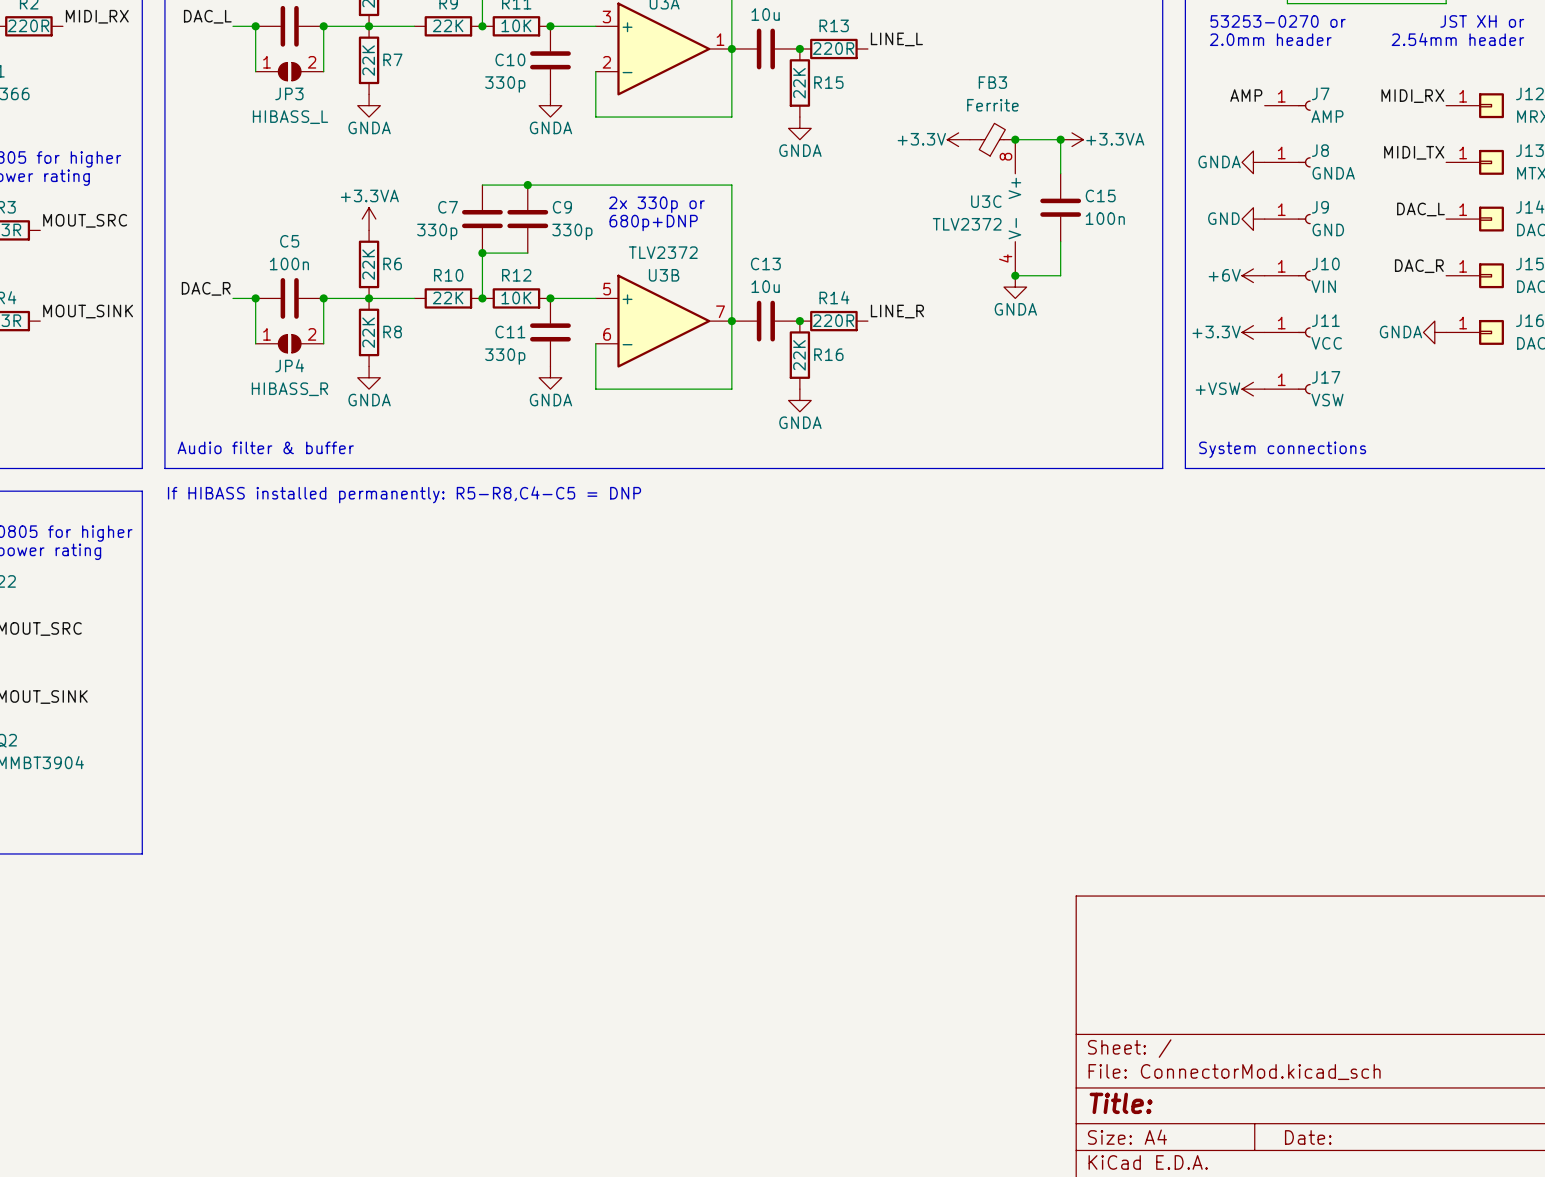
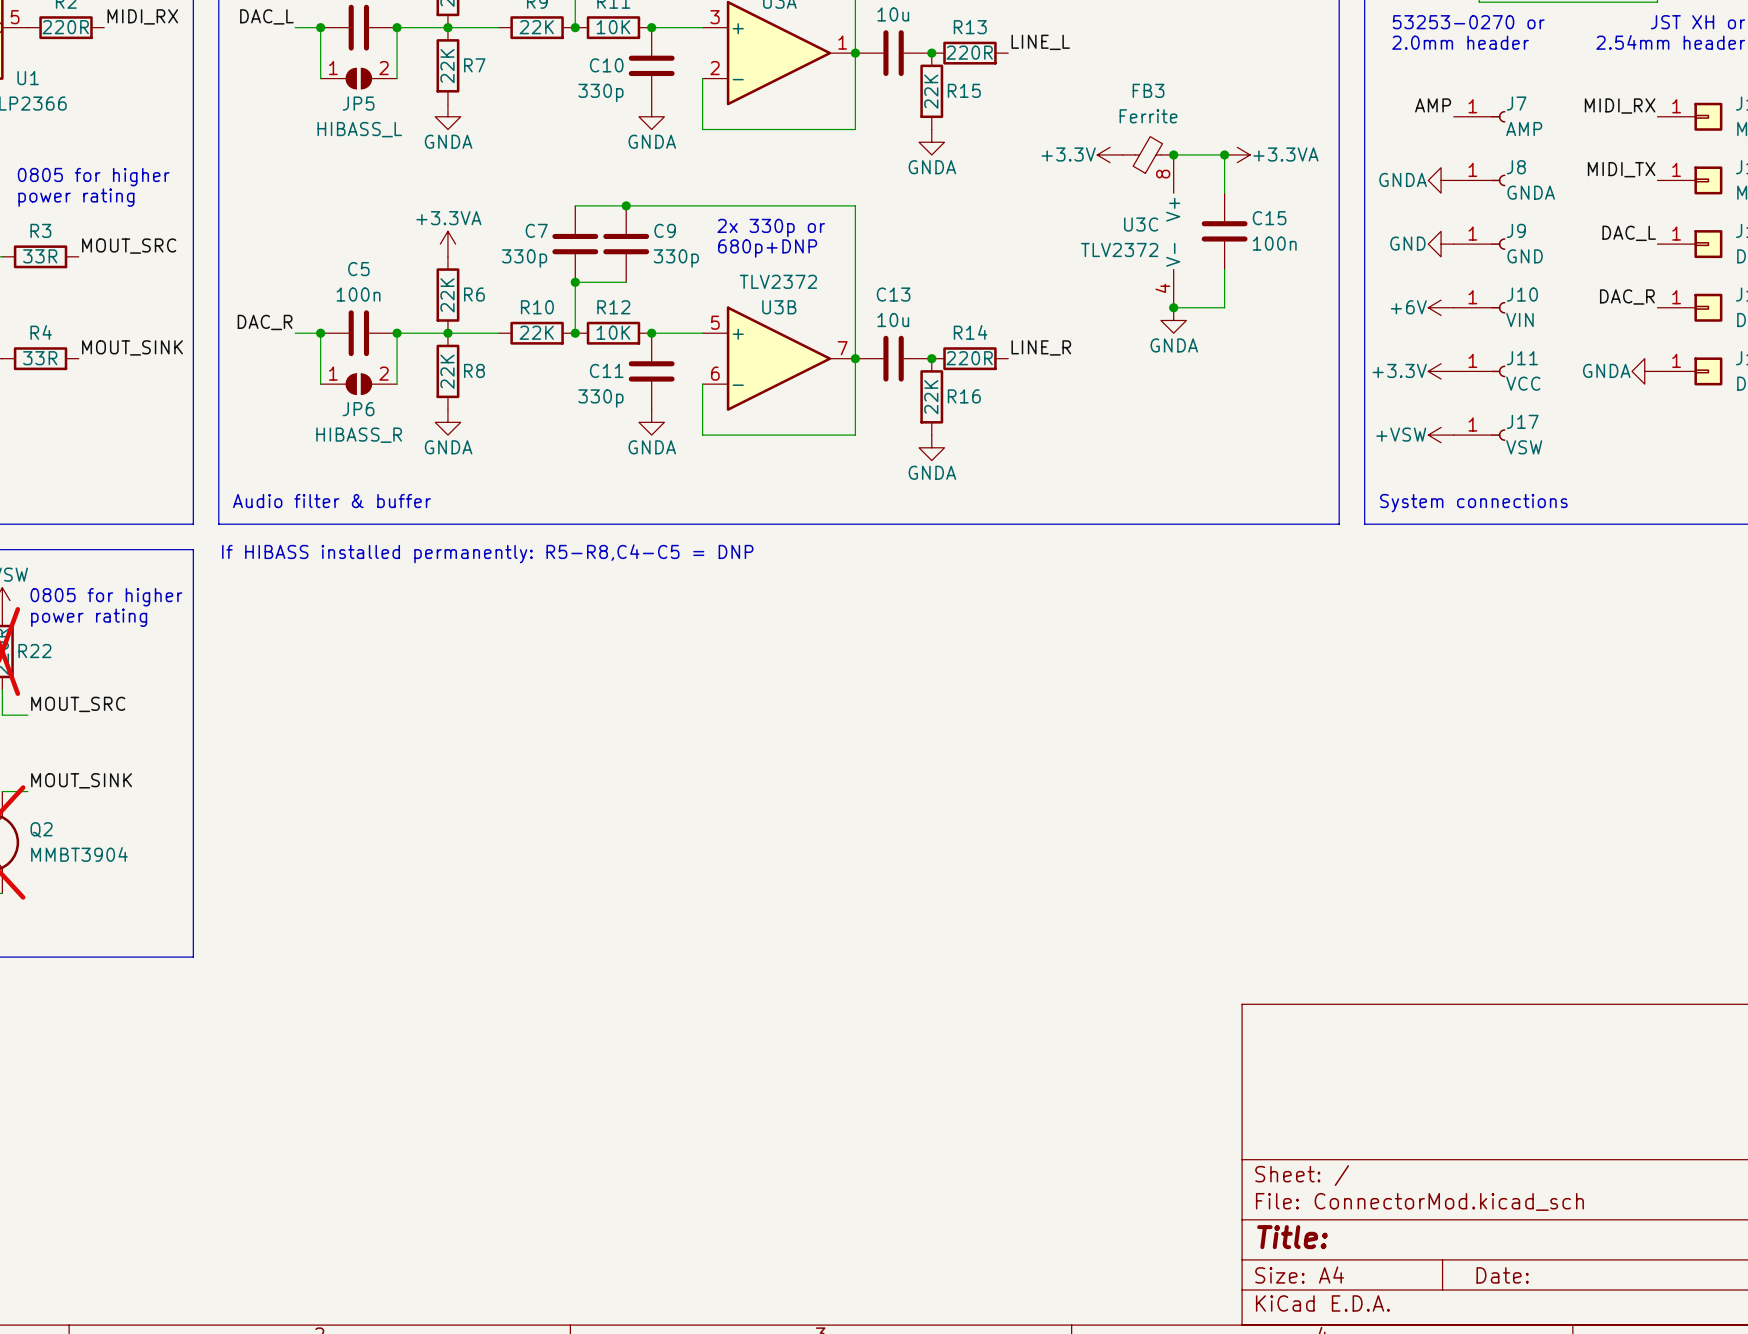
JP3 name: JP3 (289, 93) -> JP5 (358, 103)
JP4 name: JP4 (289, 365) -> JP6 (358, 409)

